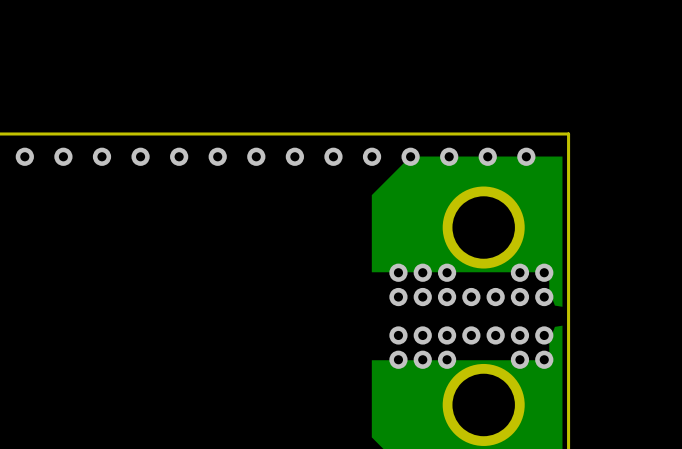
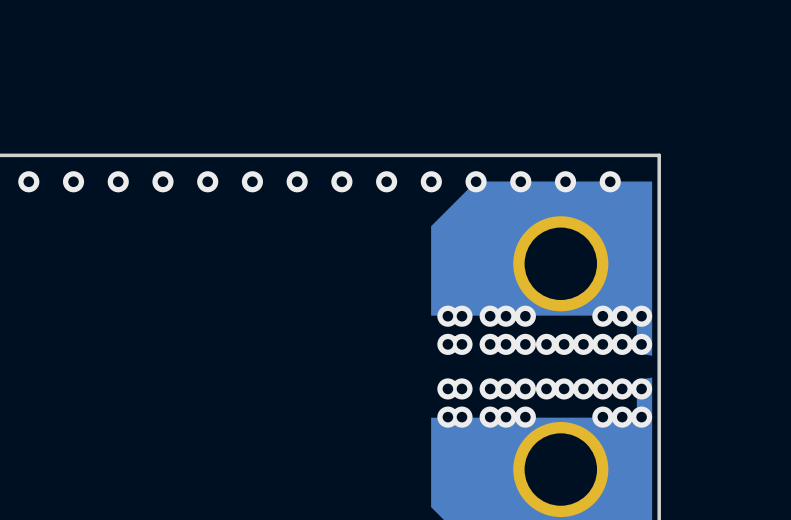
via: none -> (447, 316)
via: none -> (506, 316)
via: (447, 272) -> none
via: none -> (525, 316)
via: none -> (622, 316)
via: (544, 272) -> none
via: none -> (641, 316)
via: none -> (447, 344)
via: none -> (506, 344)
via: (447, 297) -> none
via: none -> (525, 344)
via: none -> (564, 344)
via: (495, 297) -> none
via: none -> (583, 344)
via: none -> (622, 344)
via: (544, 297) -> none
via: none -> (641, 344)
via: none -> (447, 388)
via: none -> (506, 388)
via: (447, 335) -> none
via: none -> (525, 388)
via: none -> (564, 388)
via: (495, 335) -> none
via: none -> (583, 388)
via: none -> (622, 388)
via: (544, 335) -> none
via: none -> (641, 388)
via: none -> (447, 417)
via: none -> (506, 417)
via: (447, 359) -> none
via: none -> (525, 417)
via: none -> (622, 417)
via: (544, 359) -> none
via: none -> (641, 417)

